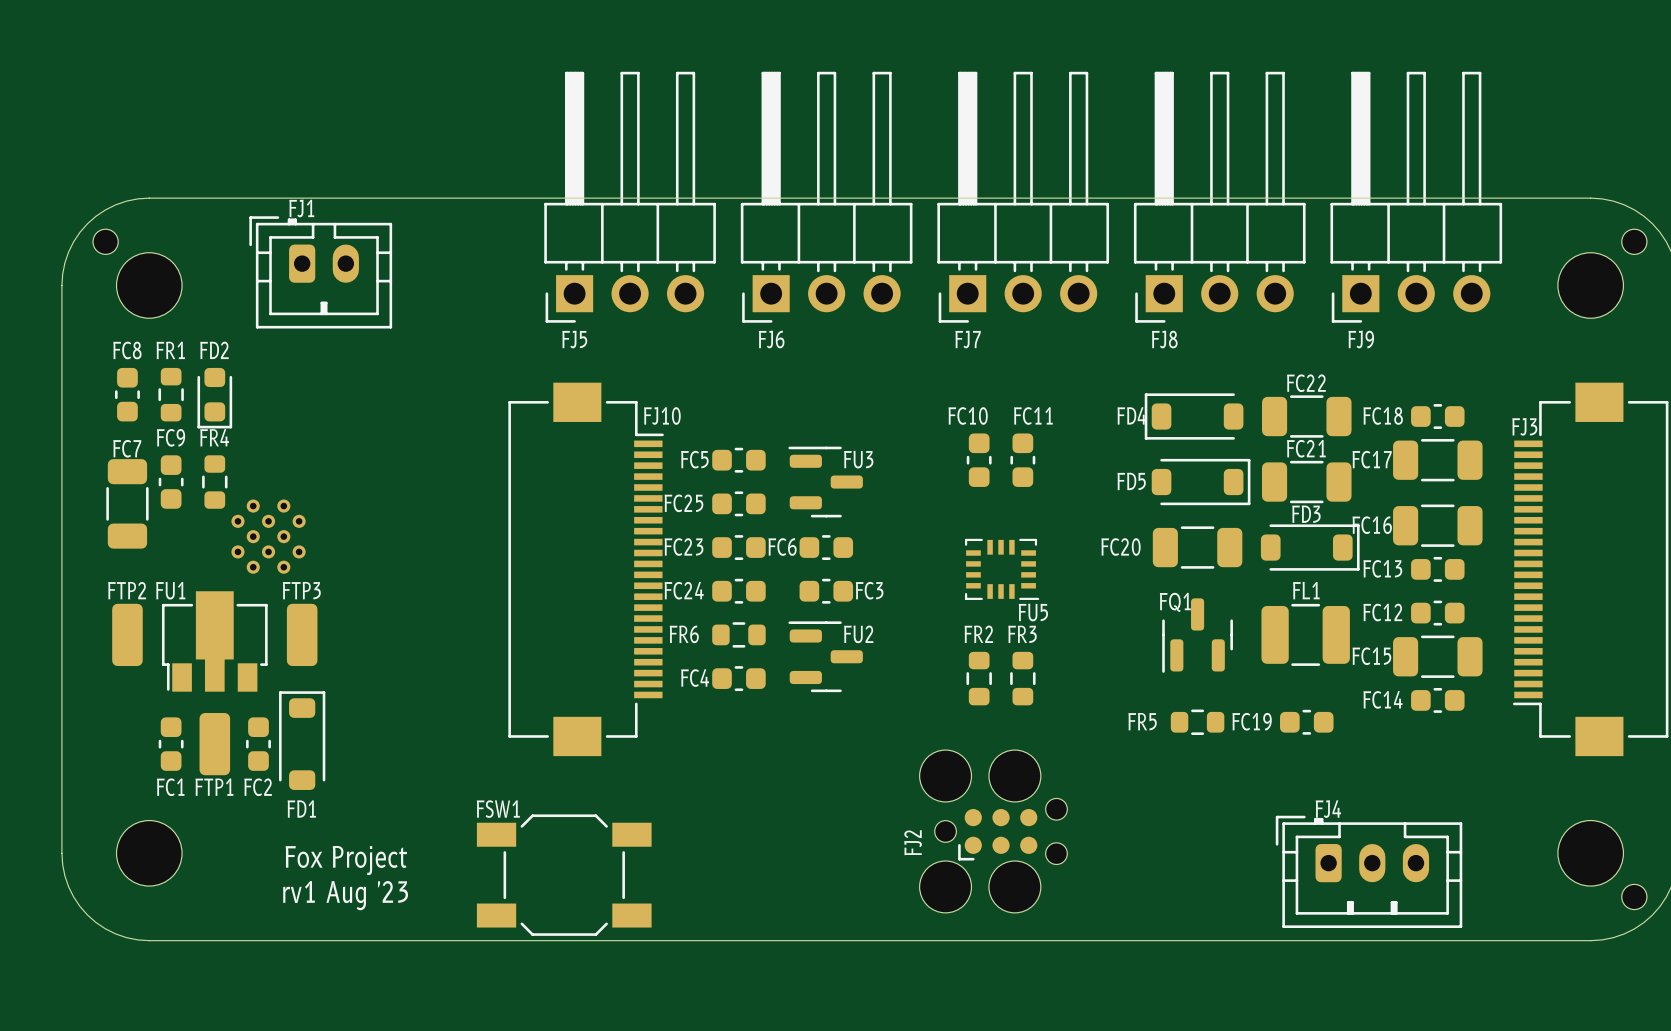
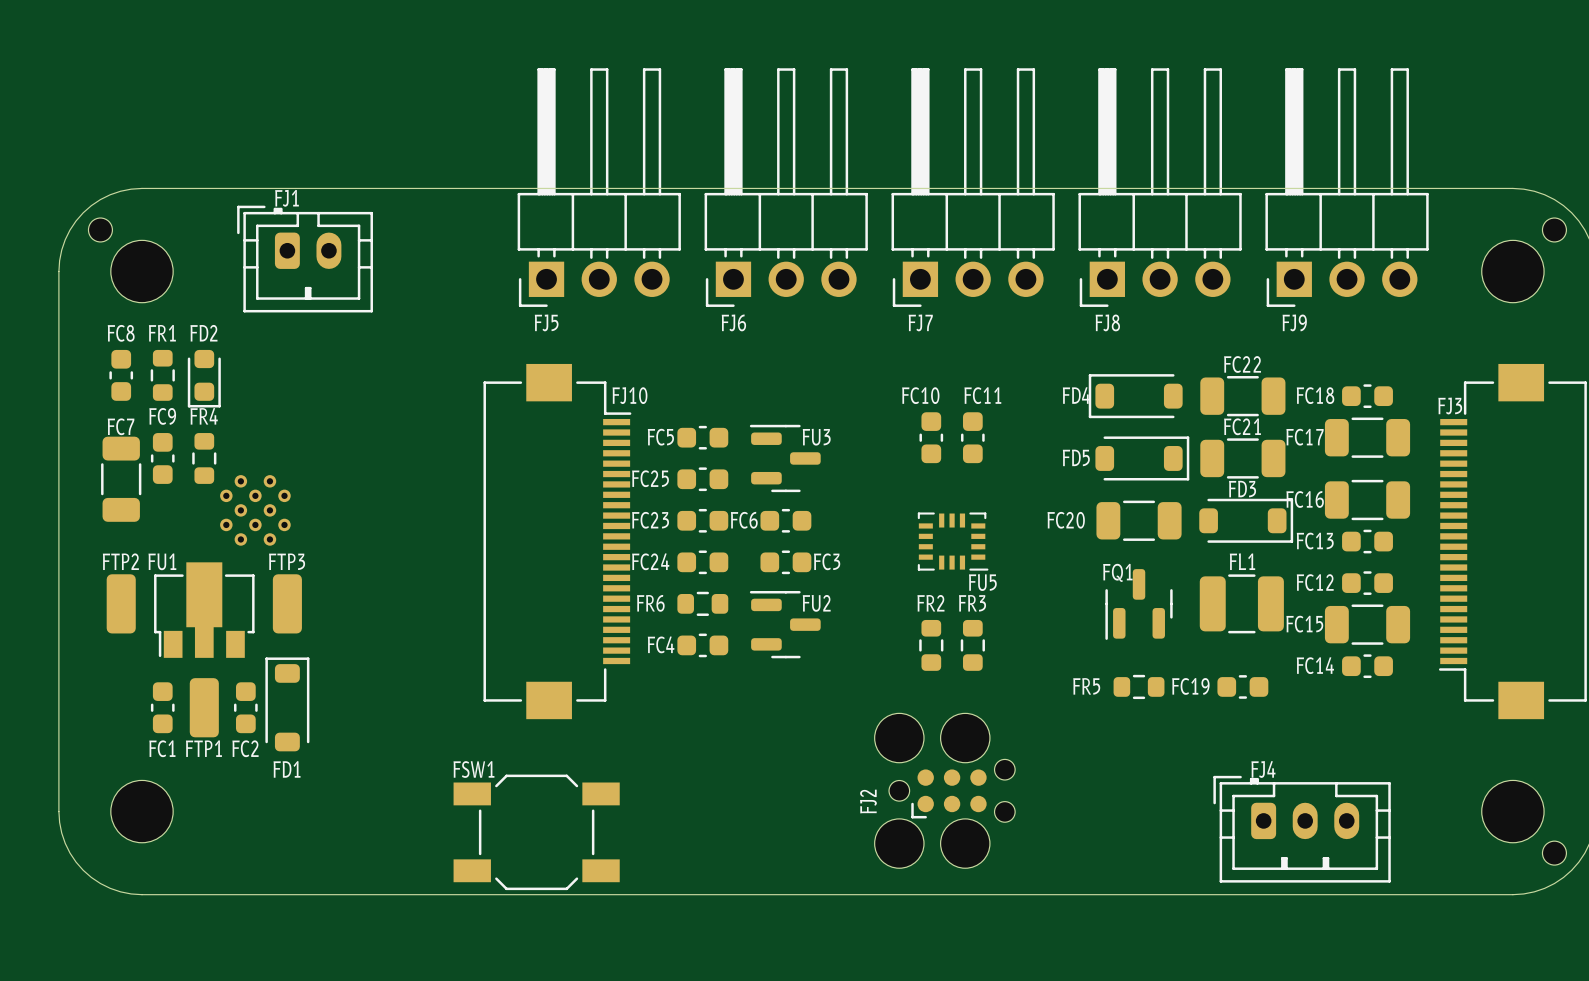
text: Fox Project (346, 860) -> none
text: rv1 Aug '23 (345, 895) -> none

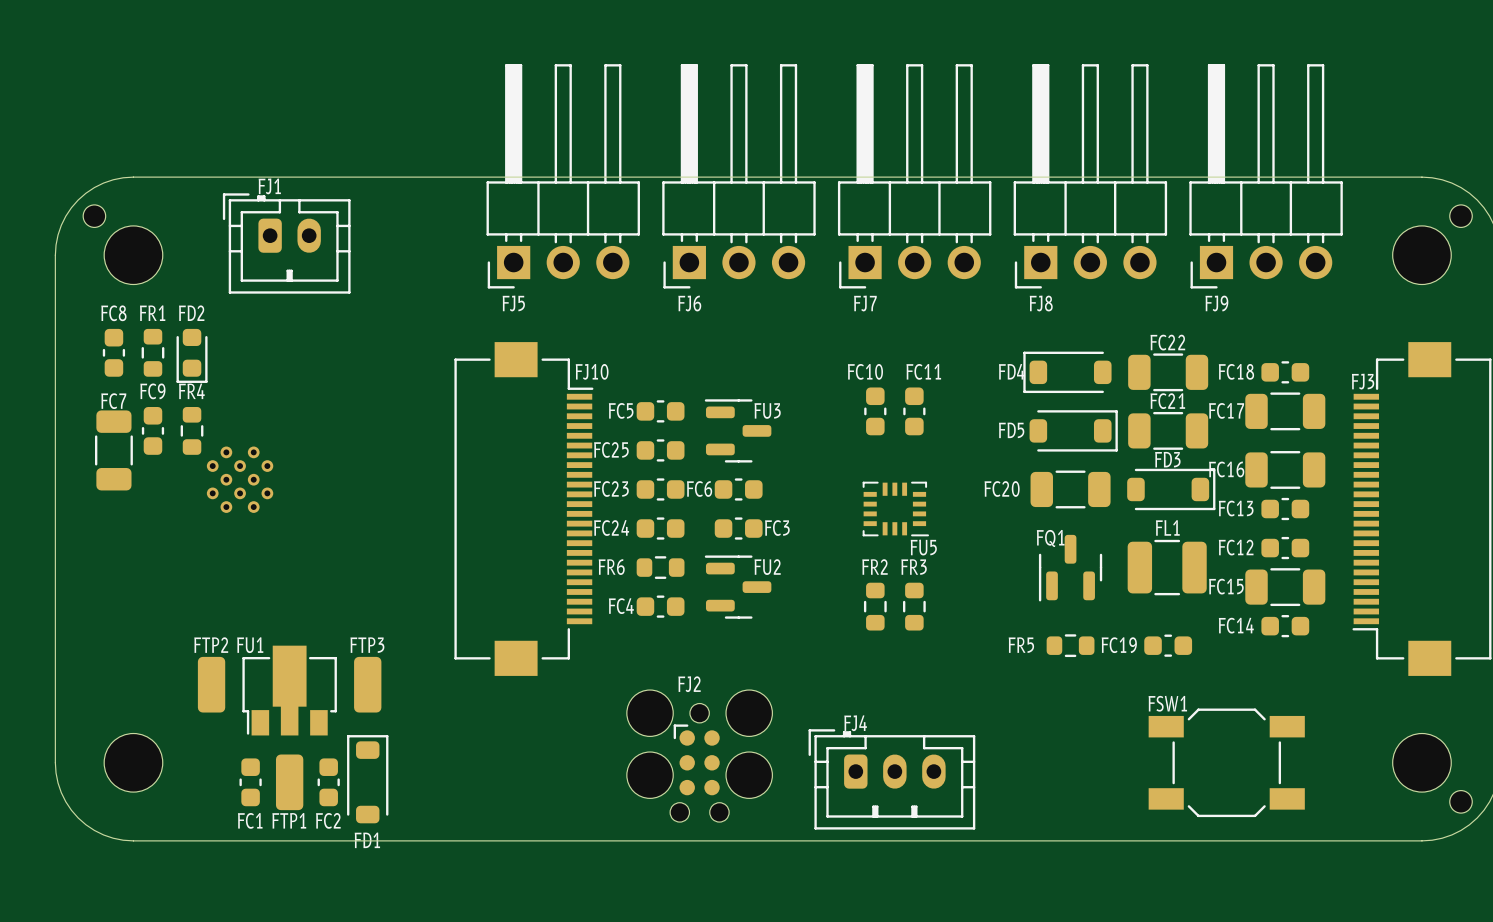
FTP2 position: (121, 603) -> (211, 684)
FTP3 position: (287, 603) -> (367, 684)
FU1 position: (204, 610) -> (289, 690)
FD1 position: (287, 704) -> (367, 779)
FC1 position: (162, 707) -> (250, 782)
FTP1 position: (204, 707) -> (289, 782)
FC2 position: (245, 707) -> (328, 782)
FJ2 rotation: 0° (944, 790) -> 90° clockwise (699, 756)
FJ2 position: (944, 790) -> (699, 756)
FJ4 position: (1302, 829) -> (891, 779)
FSW1 position: (536, 832) -> (1226, 762)

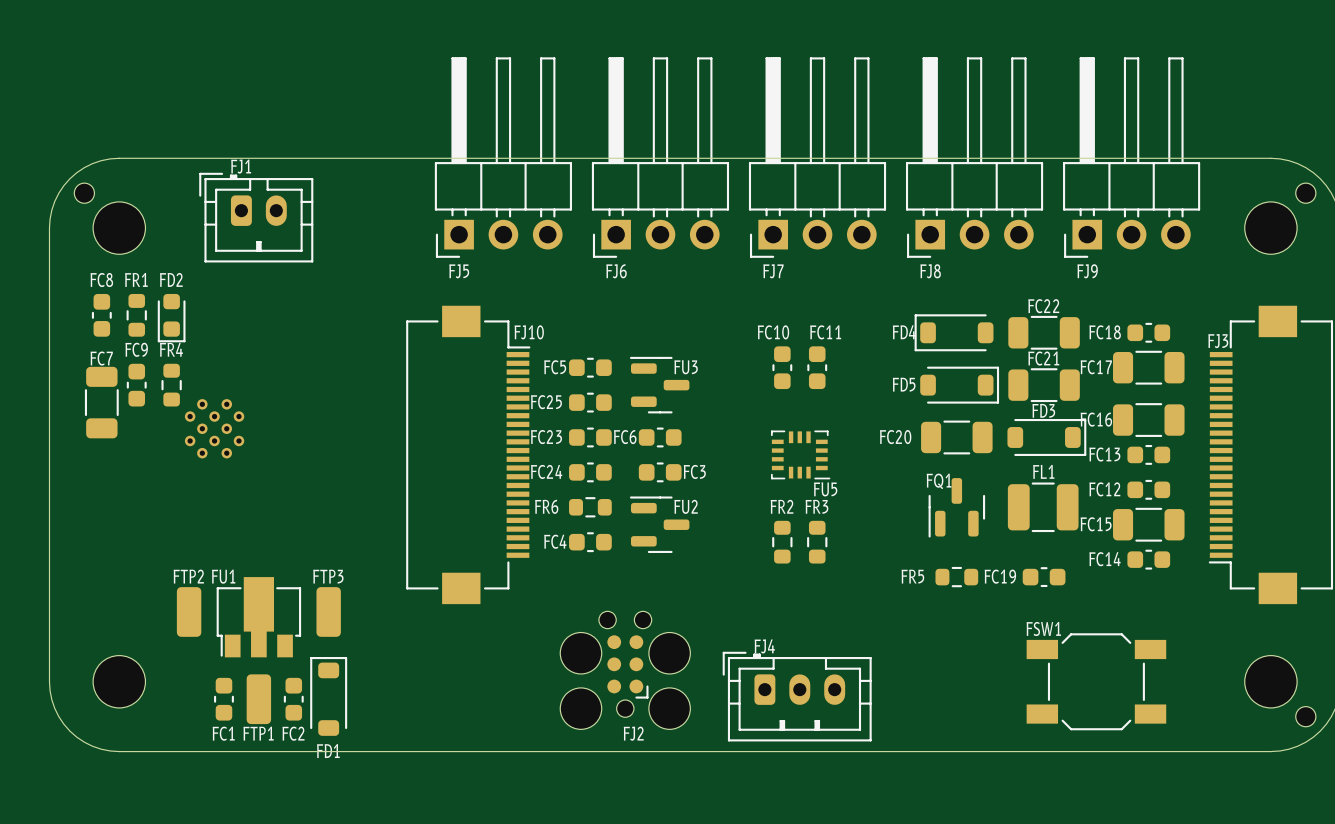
FJ2 rotation: 0° (699, 756) -> 180° (625, 670)

